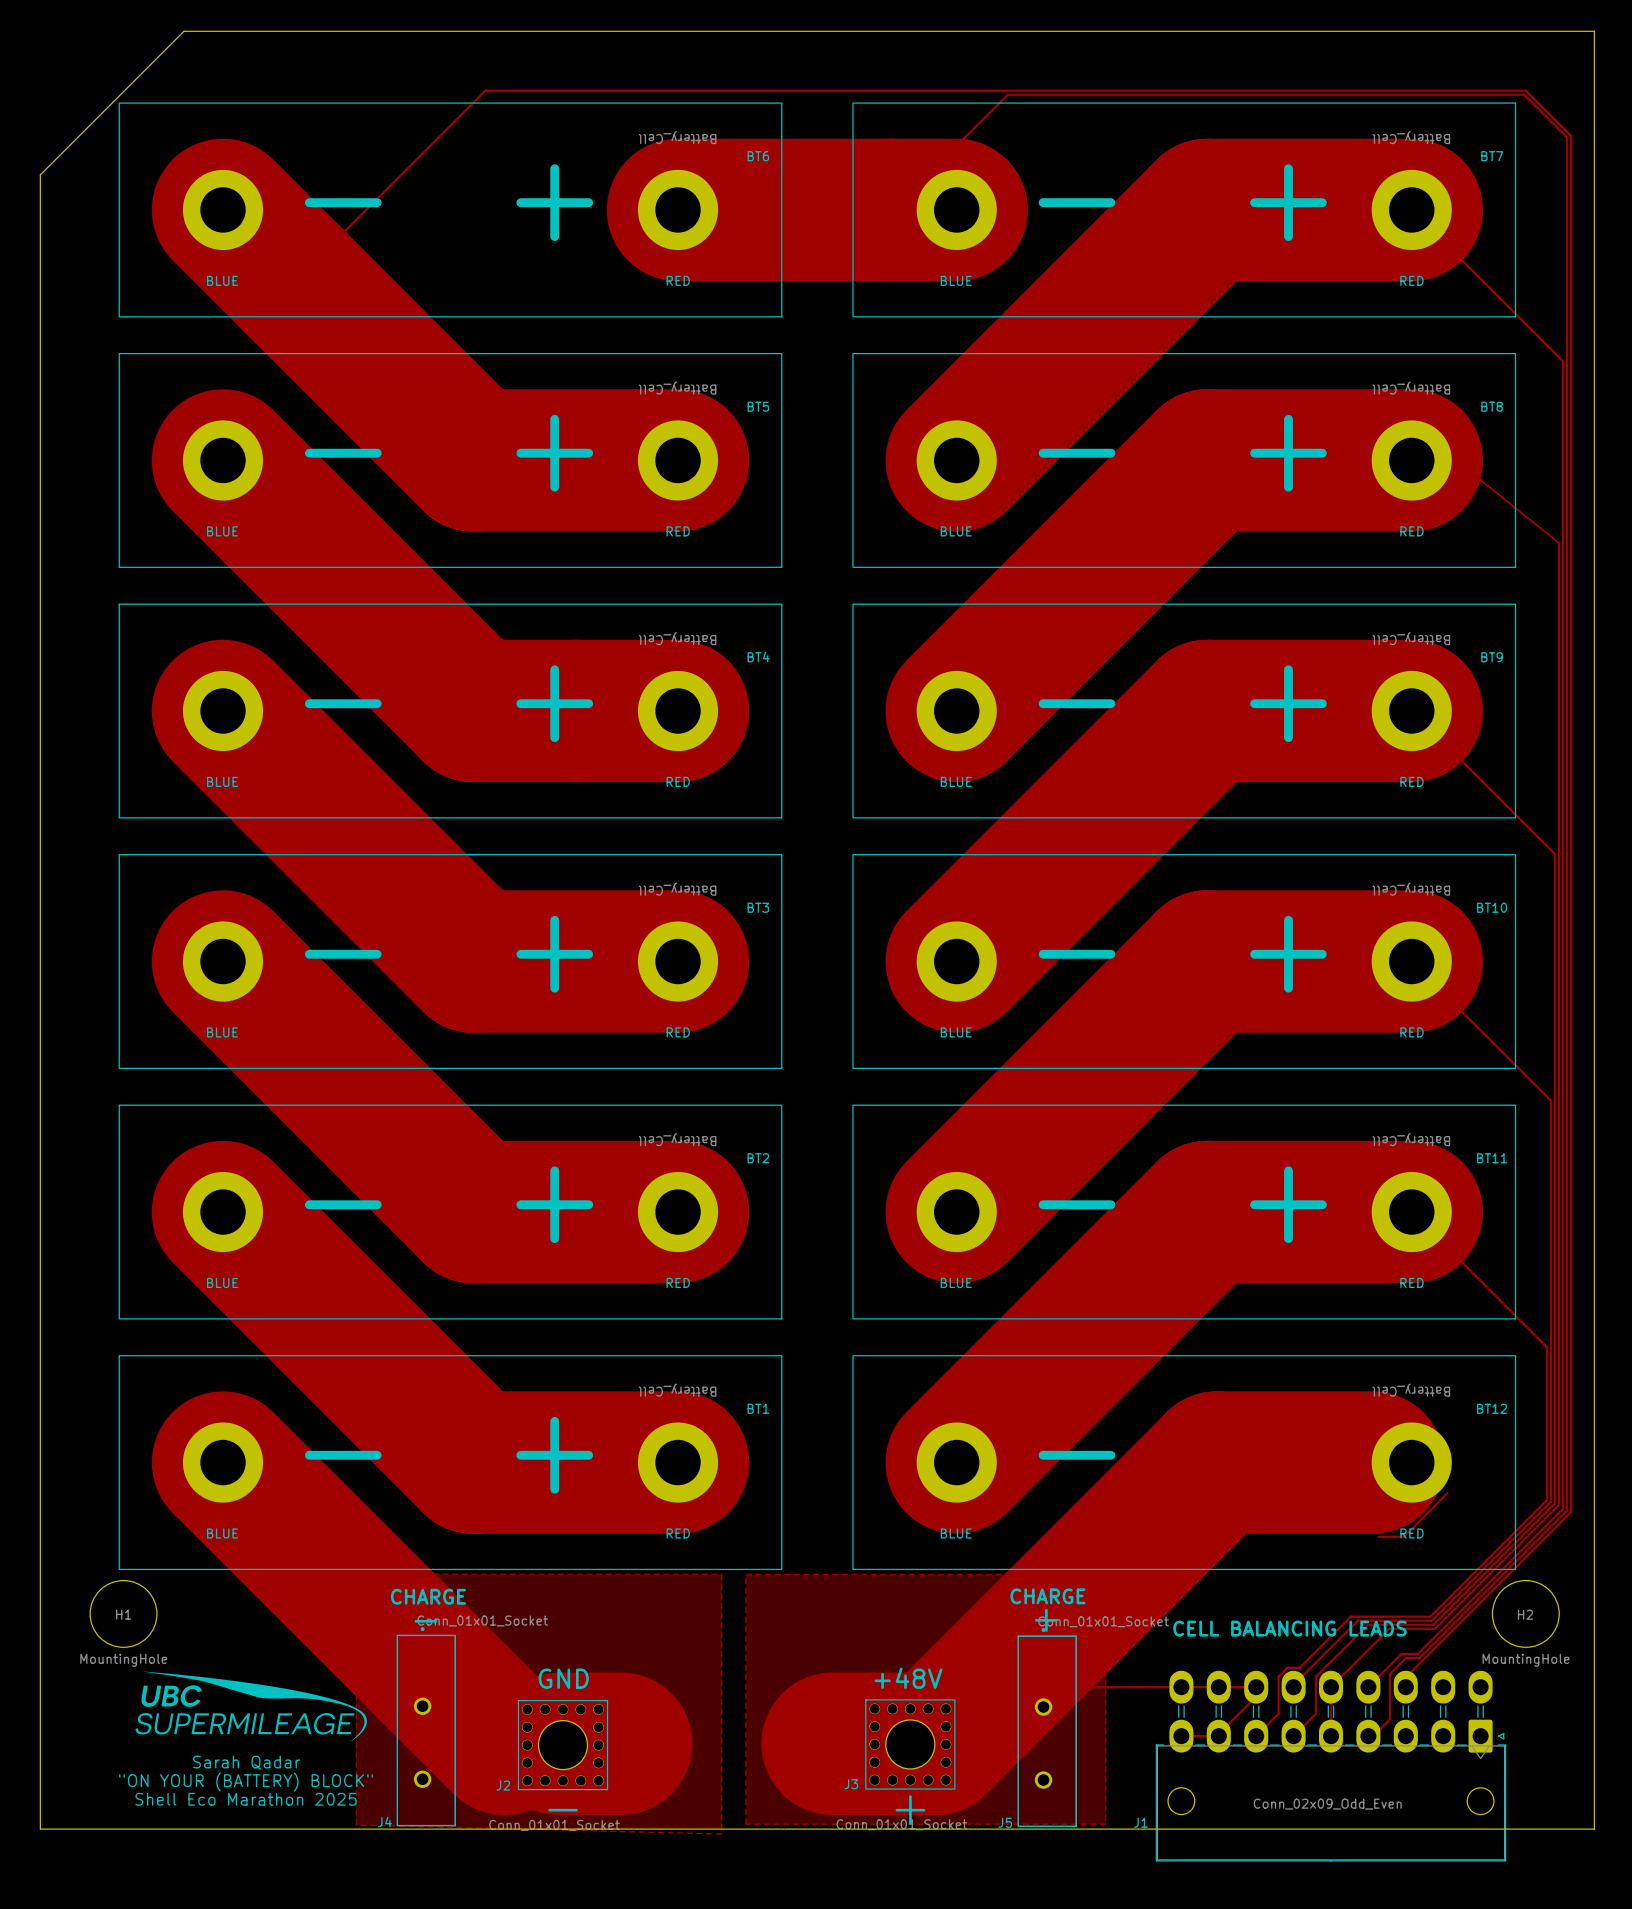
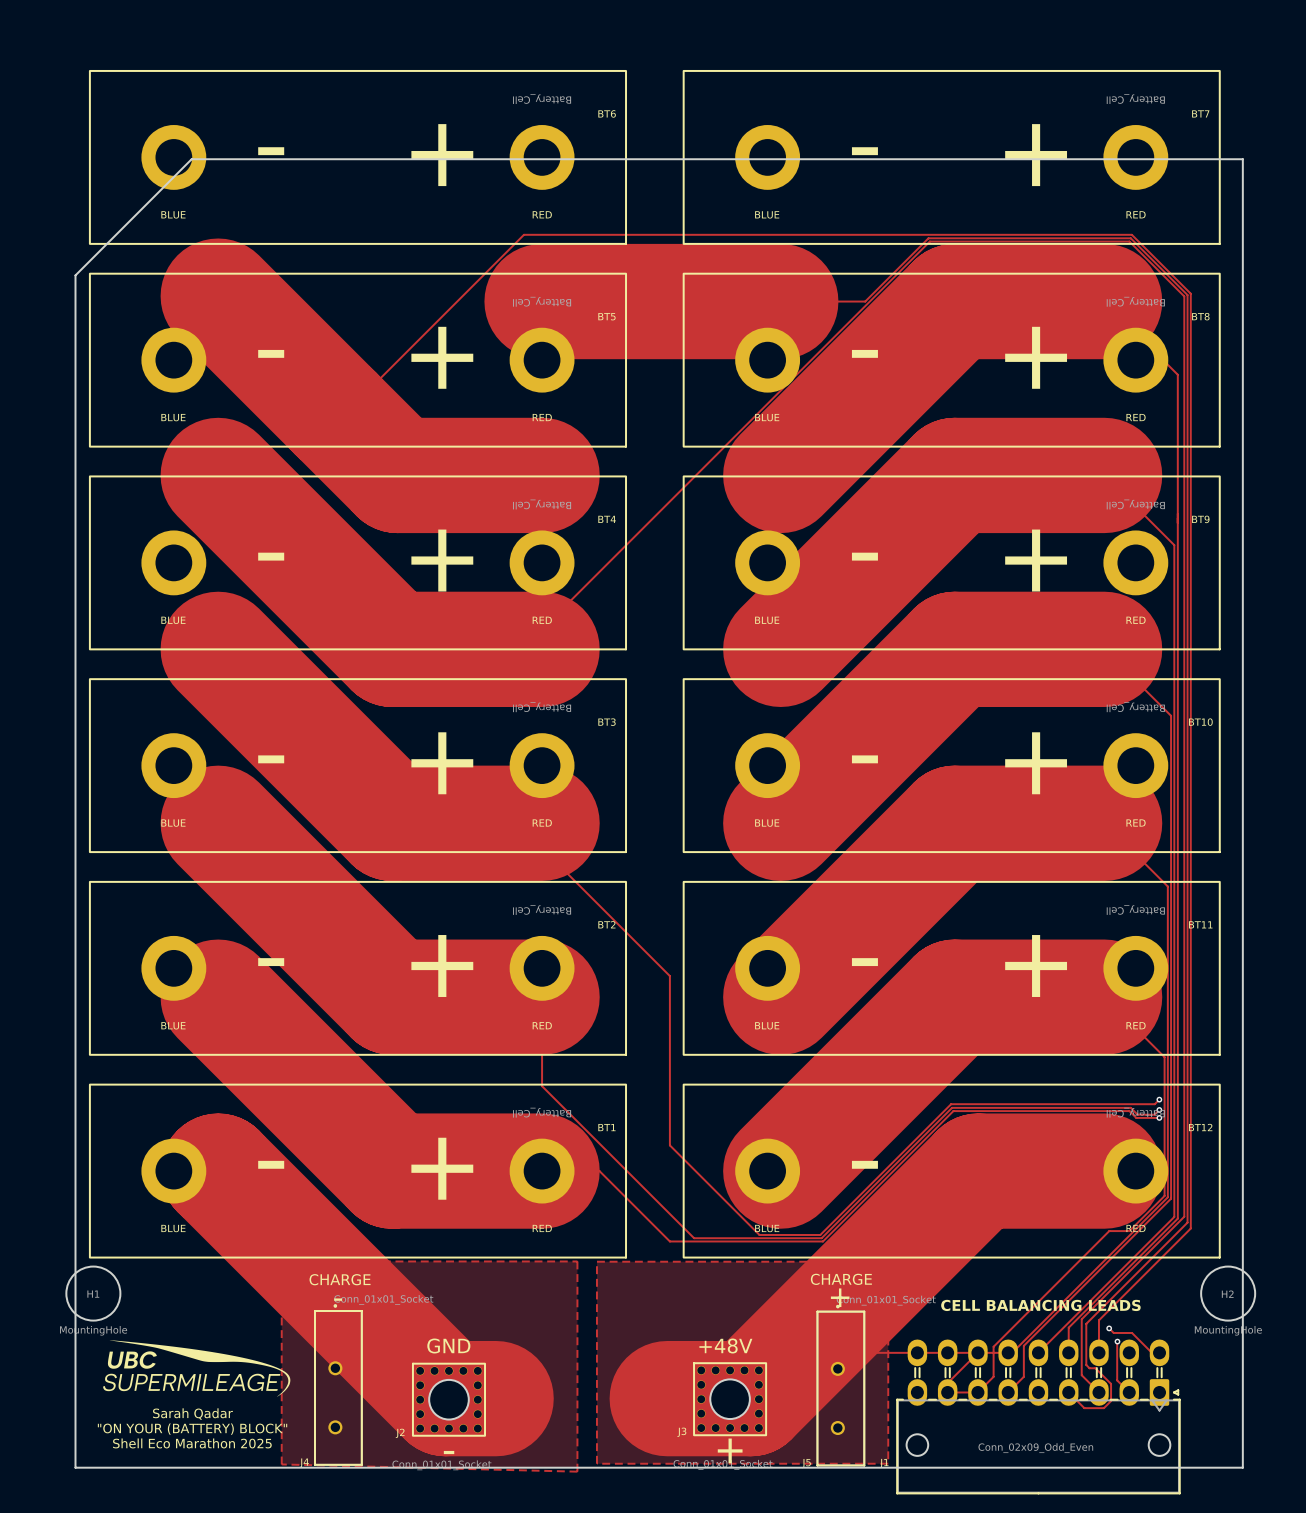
track: (222, 209) (473, 460) (678, 460) -> none
track: (678, 209) (956, 209) -> none
track: (892, 209) (1007, 94) (1524, 94) (1567, 137) (1567, 1510) (1419, 1658) (1406, 1658) (1390, 1673) (1390, 1719) (1373, 1736) (1368, 1736) -> none
track: (294, 236) (294, 281) (485, 90) (1525, 90) (1571, 135) (1571, 1512) (1405, 1677) (1405, 1687) -> none
track: none -> (218, 296) (397, 475) (542, 475)
track: none -> (542, 301) (865, 301) (928, 238) (1130, 238) (1187, 295) (1187, 1222) (1086, 1323) (1086, 1365) (1089, 1368) (1095, 1368) (1111, 1383) (1111, 1401) (1103, 1408) (1084, 1408) (1068, 1392)
track: (1390, 407) (1559, 543) (1559, 1505) (1435, 1628) (1389, 1628) (1331, 1687) (1331, 1736) -> none
track: (222, 460) (473, 710) (678, 710) -> none
track: (956, 460) (1207, 209) (1411, 209) (1563, 361) (1563, 1508) (1417, 1654) (1401, 1654) (1368, 1687) -> none
track: (1411, 460) (1207, 460) (956, 710) -> none
track: none -> (335, 413) (345, 413) (523, 234) (1131, 234) (1190, 293) (1190, 1228) (1098, 1320) (1098, 1352)
track: none -> (218, 475) (392, 649) (542, 649) (542, 629) (929, 241) (1129, 241) (1184, 296) (1184, 1216) (1081, 1319) (1081, 1375) (1098, 1392)
track: none -> (780, 475) (954, 301) (1104, 301) (1177, 374) (1177, 1218) (1068, 1327) (1068, 1342)
track: (222, 710) (473, 961) (678, 961) -> none
track: none -> (218, 649) (392, 823) (542, 823) (542, 848) (669, 976) (669, 1145) (759, 1234) (820, 1234) (951, 1104) (1154, 1104) (1159, 1099)
track: (222, 961) (473, 1212) (678, 1212) -> none
track: (956, 961) (1207, 710) (1411, 710) (1555, 854) (1555, 1503) (1433, 1624) (1367, 1624) (1316, 1676) (1316, 1713) (1293, 1736) -> none
track: none -> (218, 823) (392, 997) (542, 997) (542, 1086) (694, 1238) (821, 1238) (952, 1107) (1130, 1107) (1137, 1114) (1154, 1114) (1159, 1109)
track: none -> (780, 823) (954, 649) (1104, 649) (1171, 715) (1171, 1198) (1023, 1345) (1023, 1376) (1008, 1392)
track: (222, 1212) (473, 1462) (492, 1462) -> (218, 997) (392, 1171)
track: (956, 1212) (1207, 961) (1411, 961) (1551, 1100) (1551, 1501) (1432, 1620) (1357, 1620) -> (780, 649) (954, 475) (1104, 475) (1174, 545) (1174, 1216) (1092, 1299)
track: none -> (780, 997) (954, 823) (1104, 823) (1167, 886) (1167, 1197) (1012, 1352)
via: none -> (1159, 1099)
via: none -> (1159, 1109)
track: none -> (1159, 1117) (1136, 1117) (1129, 1111) (953, 1111) (823, 1241) (669, 1241) (599, 1171)
via: none -> (1159, 1117)
track: (222, 1462) (504, 1743) (535, 1743) -> none
track: none -> (218, 1171) (445, 1398)
track: (956, 1462) (1207, 1212) (1411, 1212) (1547, 1347) (1547, 1500) (1430, 1616) (1350, 1616) (1299, 1667) (1287, 1667) (1278, 1676) (1278, 1713) (1256, 1736) -> none
track: none -> (780, 1171) (954, 997) (1104, 997) (1164, 1057) (1164, 1195)
track: none -> (1109, 1328) (1113, 1332) (1132, 1332) (1151, 1352)
via: none -> (1109, 1328)
track: none -> (1117, 1341) (1117, 1380) (1129, 1392)
via: none -> (1117, 1341)
track: none -> (977, 1352) (947, 1383)
track: (1256, 1687) (1256, 1696) (1235, 1716) -> (1109, 1231) (993, 1346) (993, 1376)
J1 position: (1331, 1766) -> (1038, 1416)
board edge: (101, 1829) (40, 1829) (40, 174) (183, 31) (1594, 31) (1594, 1829) (1543, 1829) -> (75, 1467) (75, 275) (191, 159) (1242, 159) (1242, 1467)

